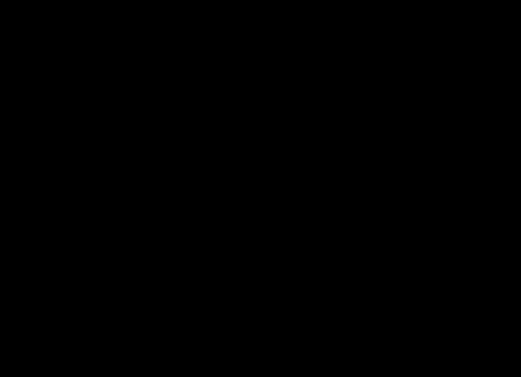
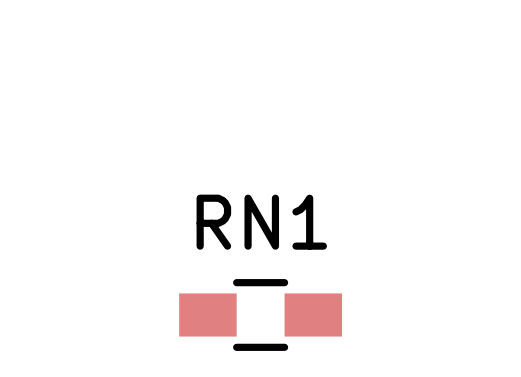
RN1: none -> (260, 314)

